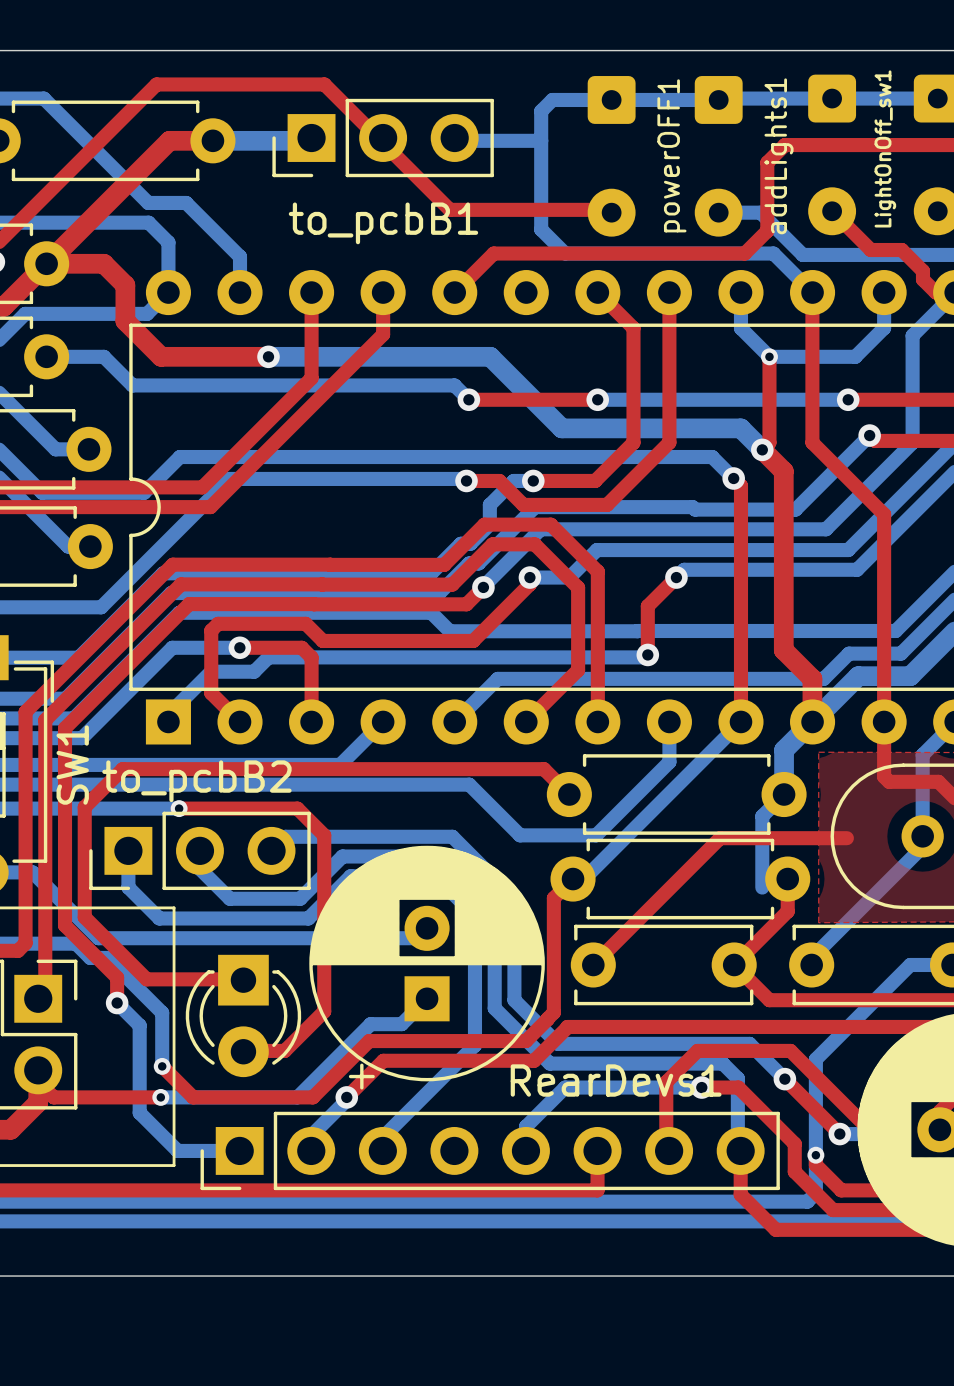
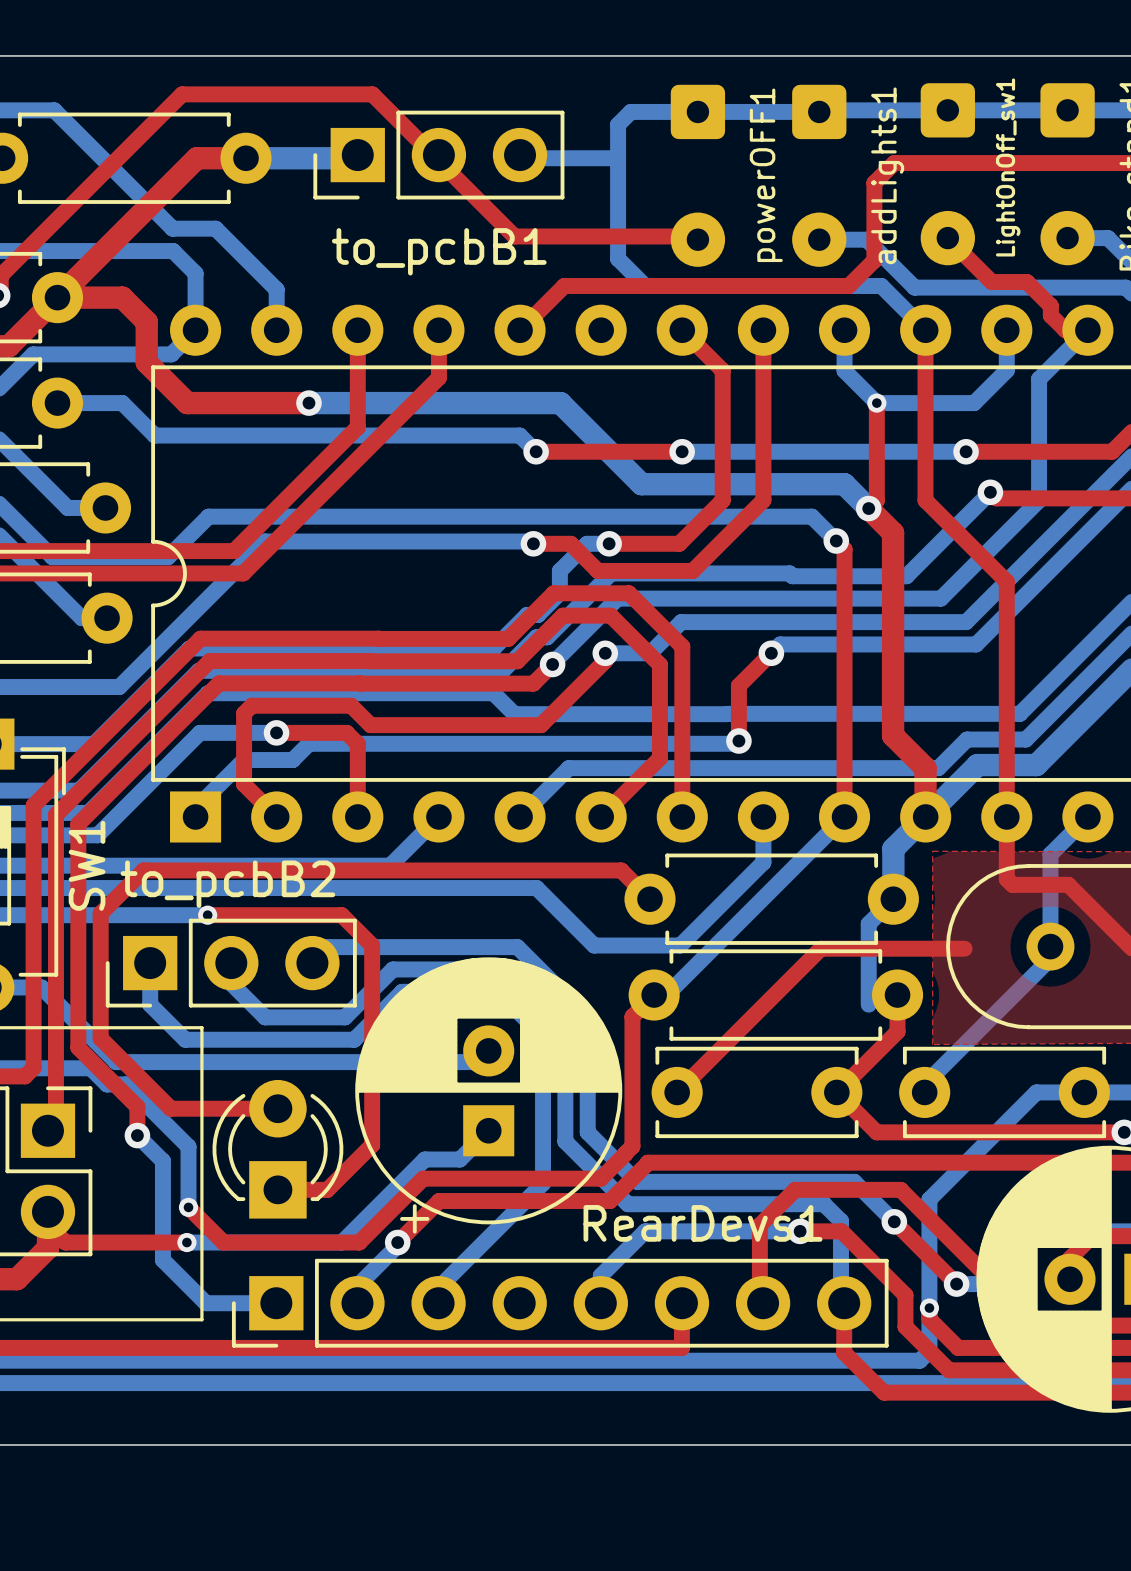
part footprint: [185, 954, 302, 1078] -> [212, 1079, 344, 1219]

